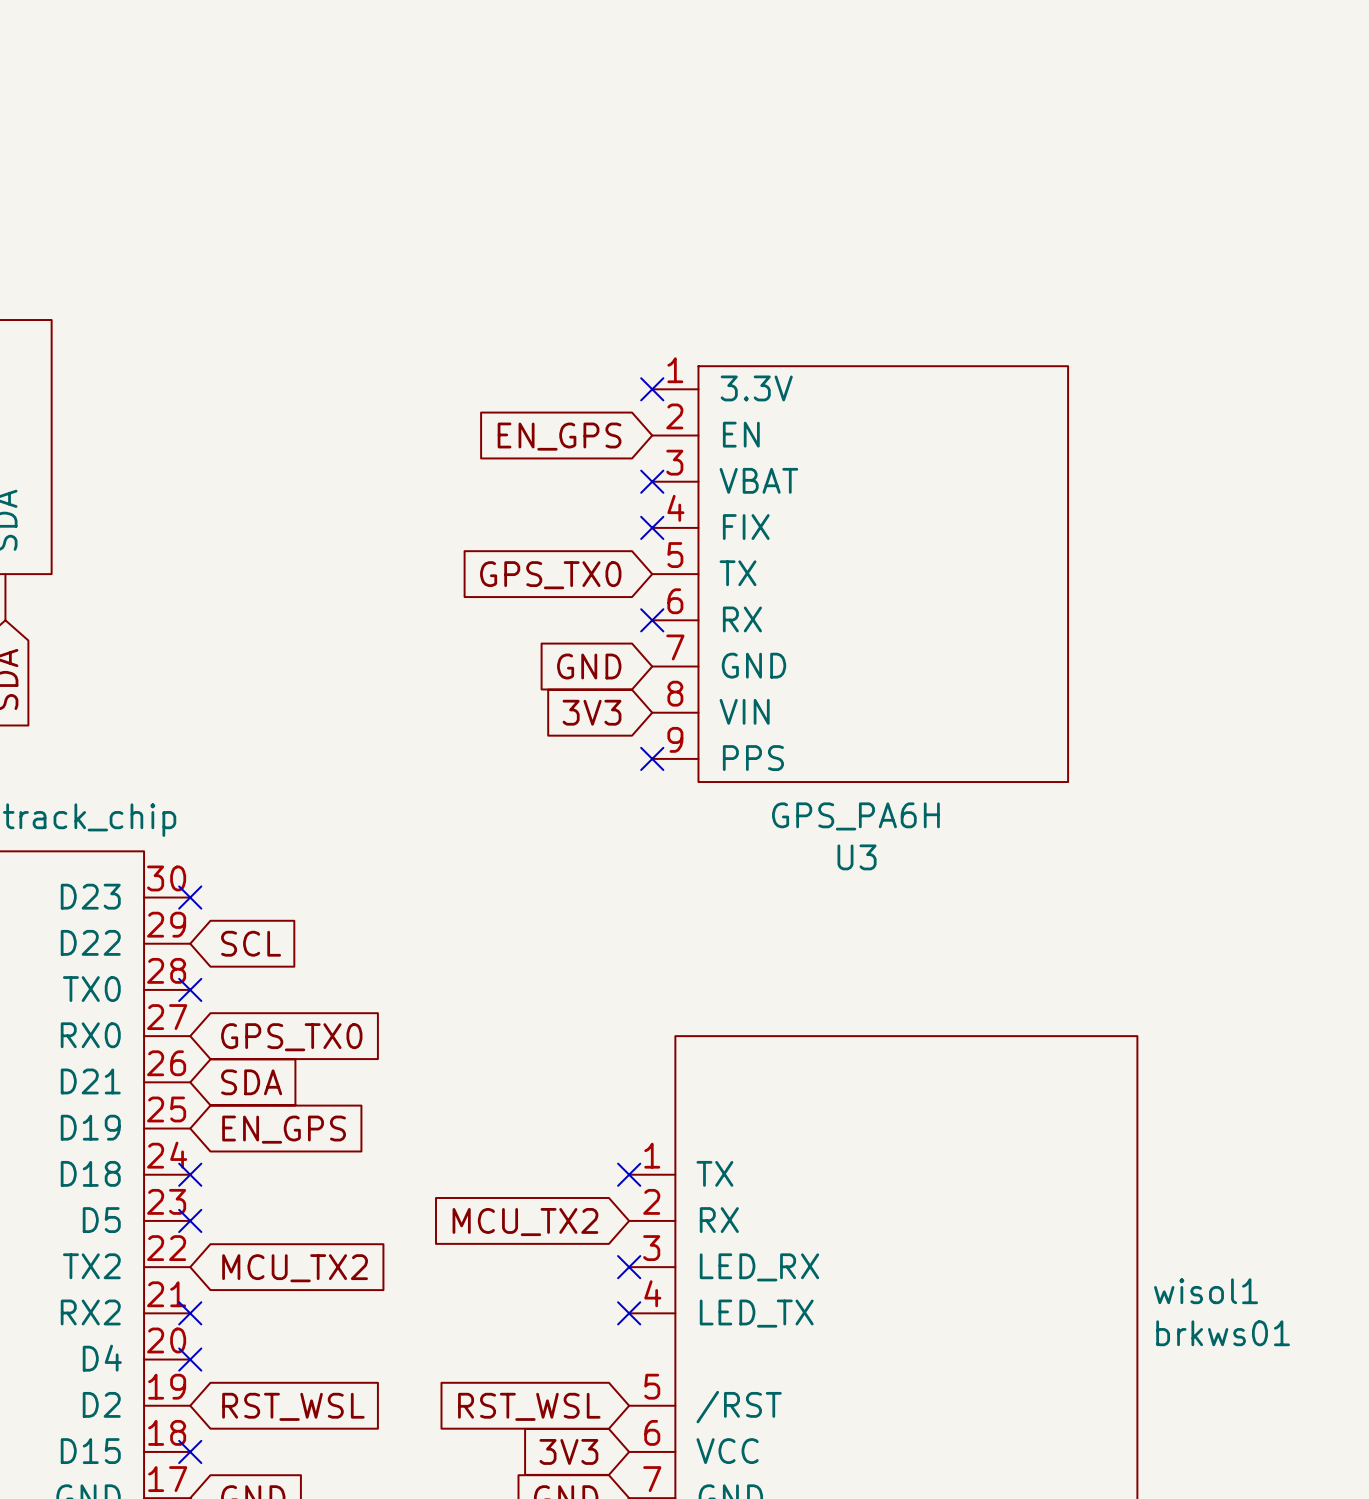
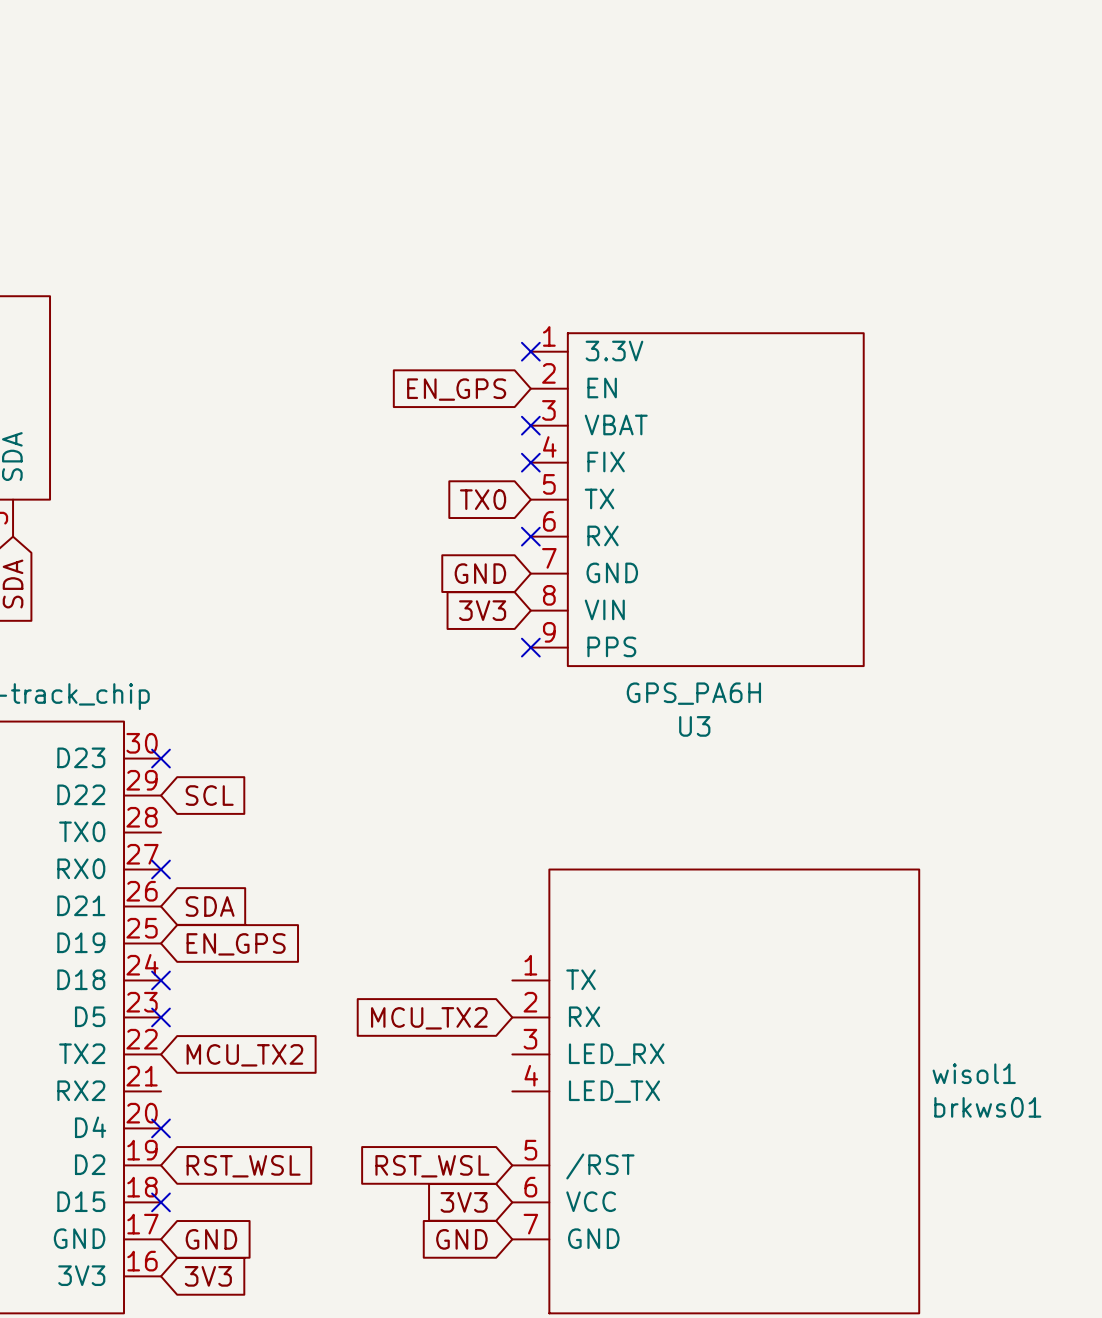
global label: GPS_TX0 (550, 575) -> TX0 (483, 499)
no-connect mark position: (190, 989) -> (160, 869)
global label: GPS_TX0 (291, 1037) -> none
no-connect mark: (629, 1174) -> none
no-connect mark: (629, 1267) -> none
no-connect mark: (190, 1313) -> none
no-connect mark: (629, 1313) -> none

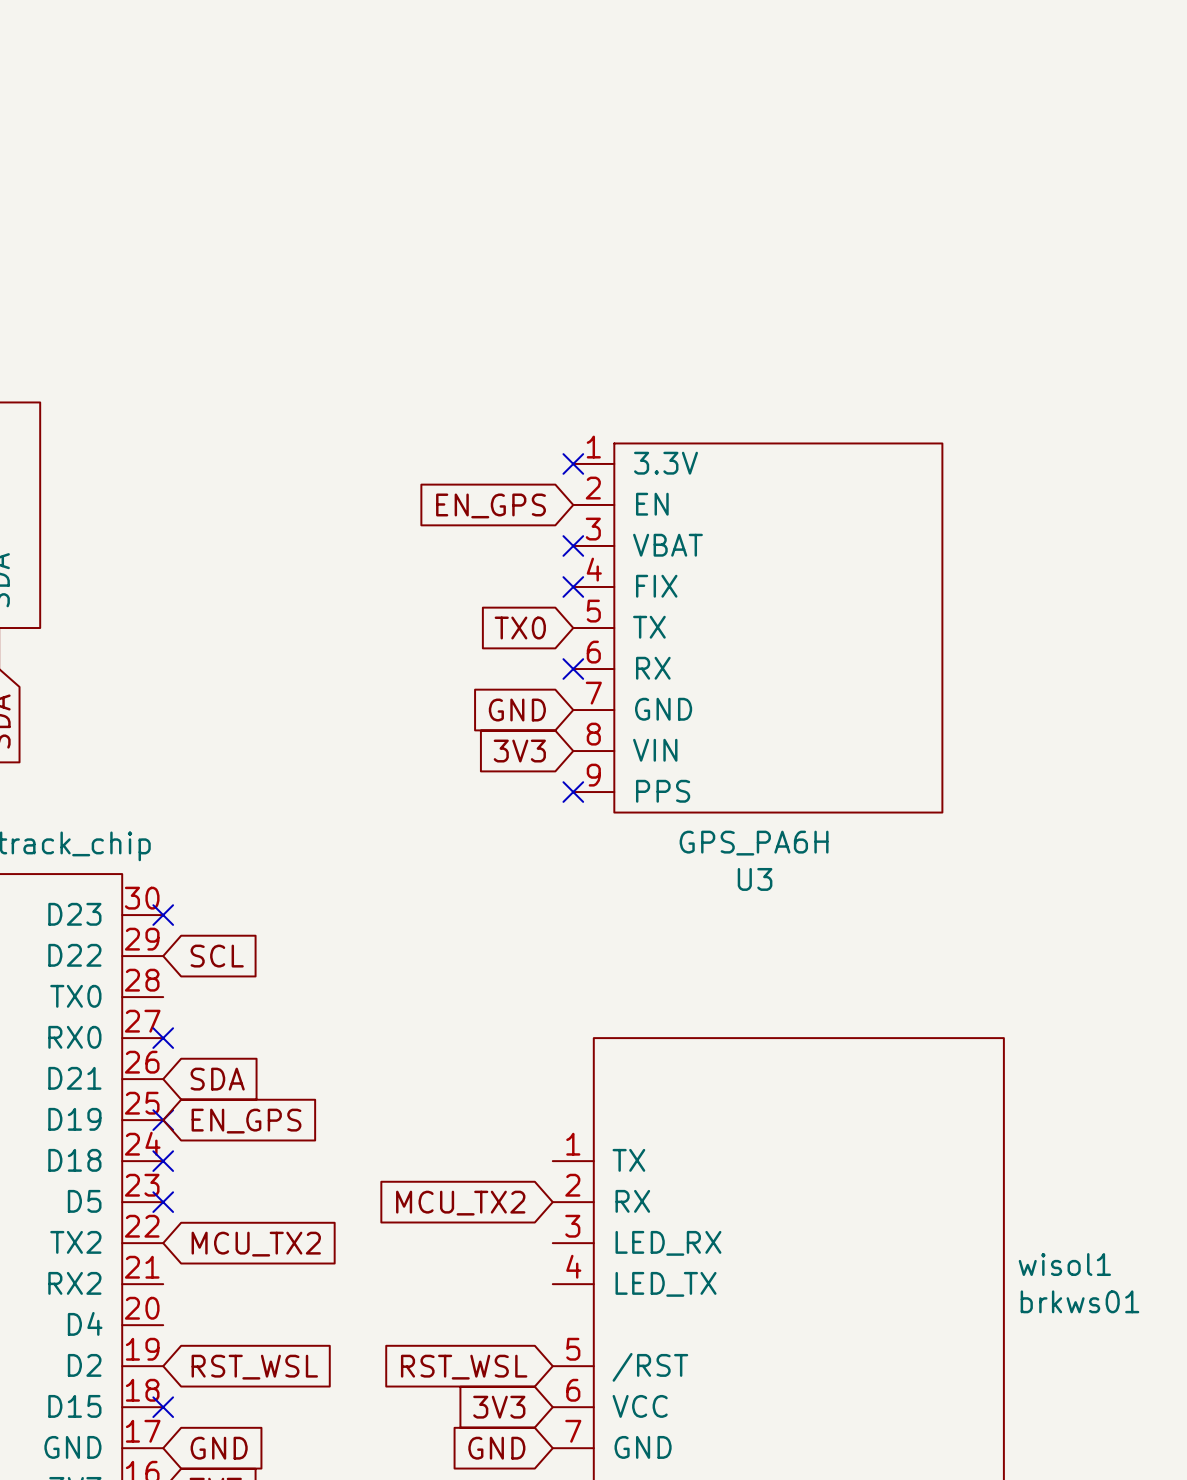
no-connect mark: none -> (163, 1120)
no-connect mark: (160, 1128) -> none

